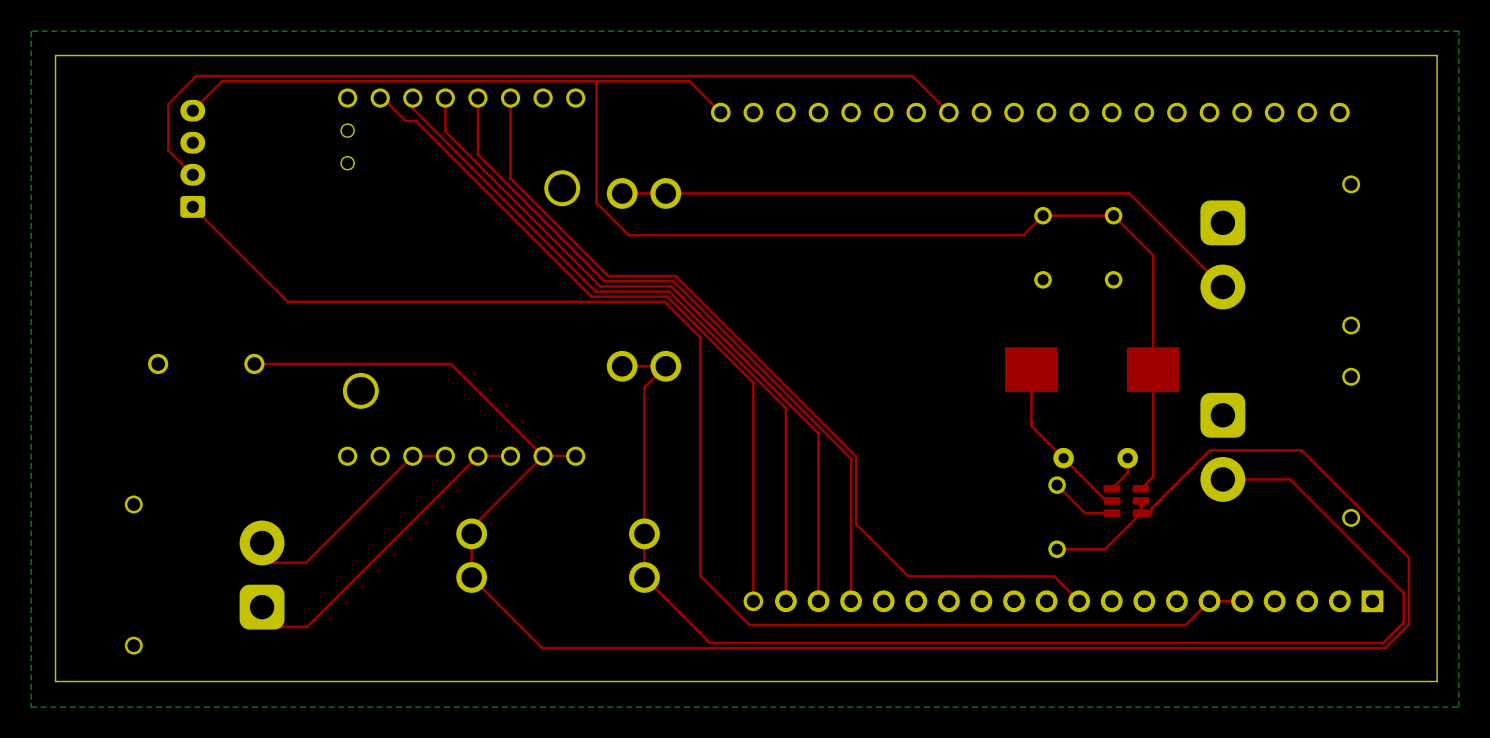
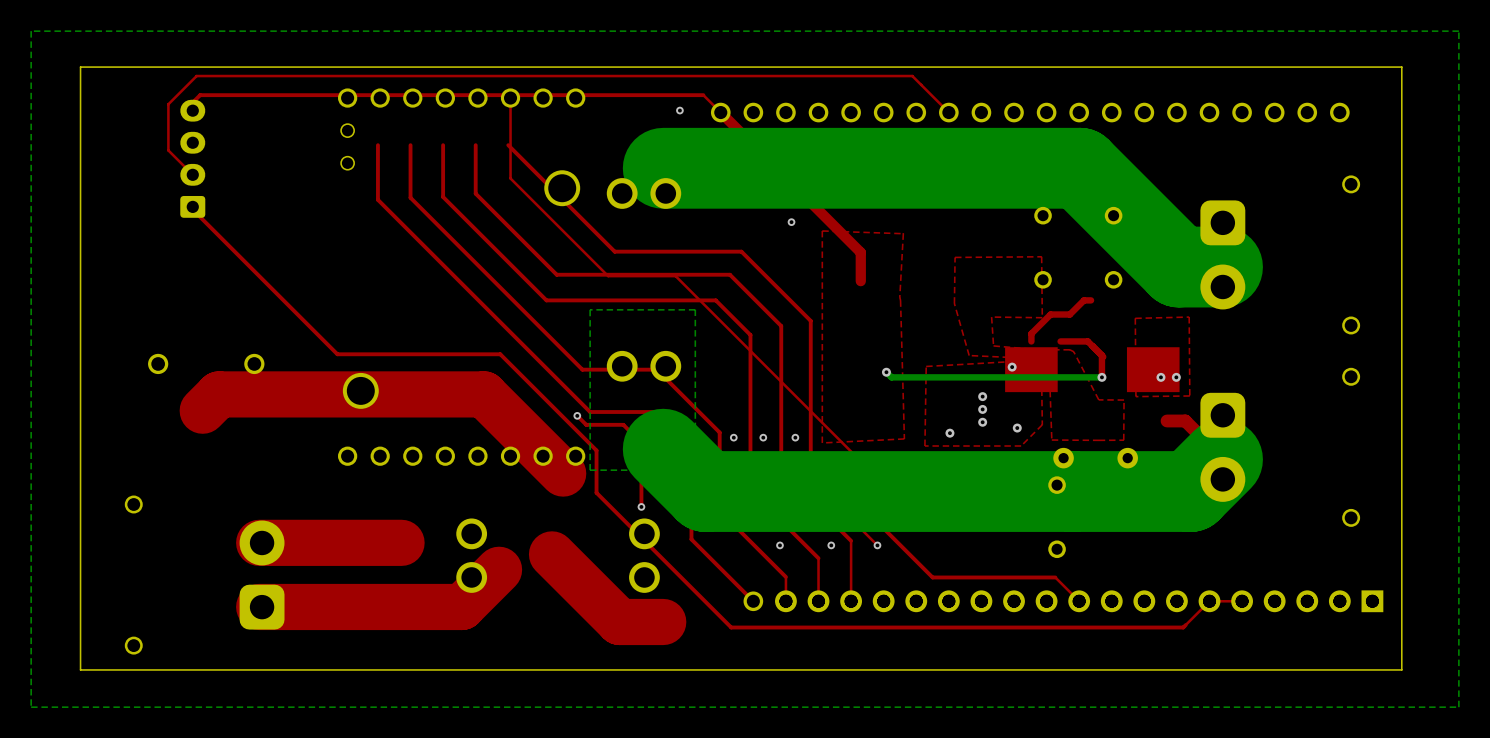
board edge: (1437, 55) (55, 55) (55, 681) (1437, 681) (1437, 55) -> (1401, 67) (1401, 669) (80, 669) (80, 67) (1401, 67)
top track: (596, 81) (596, 202) (628, 235) (1023, 235) (1043, 215) (1113, 215) (1153, 255) (1153, 476) (1141, 488) -> none
top track: (703, 95) (689, 81) (222, 81) (192, 110) -> (703, 95) (200, 95) (187, 107)
top track: (380, 98) (382, 98) (405, 120) (415, 120) (591, 296) (667, 296) (753, 382) (753, 601) -> (377, 145) (377, 199) (590, 412) (660, 412) (691, 442) (691, 539) (753, 601)
top track: (412, 98) (412, 108) (595, 291) (669, 291) (785, 408) (785, 577) -> (410, 145) (410, 197) (582, 369) (656, 369) (719, 432) (719, 510) (785, 577)
top track: (445, 98) (445, 131) (600, 286) (671, 286) (818, 433) (818, 558) -> (443, 145) (443, 197) (546, 300) (715, 300) (750, 335) (750, 490) (818, 558)
top track: (477, 98) (477, 154) (604, 281) (673, 281) (851, 458) (851, 540) -> (475, 145) (475, 193) (556, 274) (729, 274) (781, 326) (781, 471) (851, 540)
via: none -> (679, 110)
top track: none -> (720, 112) (860, 252) (860, 281)
bottom track: none -> (663, 168) (1080, 168) (1178, 267) (1222, 267)
top track: (622, 193) (1129, 193) (1222, 286) -> none
top track: (192, 206) (287, 301) (664, 301) (700, 337) (700, 576) (749, 625) (1185, 625) -> (187, 204) (337, 354) (500, 354) (596, 450) (596, 492) (731, 627) (1183, 627) (1185, 625)
via: none -> (791, 222)
top zone outline: none -> (822, 230) (822, 442) (904, 438) (899, 297) (903, 233) (822, 230)
top zone outline: none -> (1041, 256) (955, 257) (954, 303) (969, 355) (1039, 358) (1039, 349) (993, 345) (991, 317) (1042, 317) (1041, 256)
top track: none -> (1091, 300) (1083, 300) (1069, 314) (1050, 314) (1031, 333) (1031, 341)
bottom zone outline: none -> (695, 309) (590, 309) (590, 470) (695, 470) (695, 309)
top zone outline: none -> (1189, 317) (1189, 395) (1135, 396) (1135, 318) (1189, 317)
top track: none -> (1060, 341) (1087, 341) (1103, 356)
top zone outline: none -> (1069, 349) (1048, 349) (1051, 440) (1123, 440) (1124, 400) (1098, 399) (1073, 351) (1069, 349)
top track: none -> (1101, 355) (1101, 377)
top zone outline: none -> (1041, 361) (926, 366) (924, 445) (1021, 445) (1042, 424) (1041, 361)
top track: (254, 363) (450, 363) (543, 456) -> none
top track: (622, 366) (665, 366) (644, 387) (644, 577) (710, 643) (1383, 643) (1403, 622) (1403, 593) (1290, 479) (1222, 479) -> none
via: none -> (1012, 367)
top track: (1031, 369) (1031, 425) (1106, 500) (1111, 500) -> none
bottom track: none -> (886, 372) (891, 377) (1101, 377)
via: none -> (886, 372)
via: none -> (1101, 377)
via: none -> (1160, 377)
via: none -> (1176, 377)
via: none -> (982, 396)
via: none -> (982, 409)
top track: none -> (202, 410) (219, 394) (484, 394) (563, 473)
top track: none -> (577, 415) (586, 424) (623, 424) (641, 442) (641, 506)
via: none -> (577, 415)
top track: none -> (1167, 420) (1185, 420) (1222, 458)
via: none -> (982, 422)
via: none -> (1017, 428)
via: none -> (949, 433)
via: none -> (733, 437)
via: none -> (763, 437)
via: none -> (795, 437)
bottom track: none -> (663, 449) (705, 491) (1190, 491) (1222, 459)
top track: (445, 456) (412, 456) (306, 562) (262, 562) (262, 542) -> none
top track: (510, 456) (477, 456) (307, 626) (262, 626) (262, 607) -> none
top track: (543, 456) (471, 527) (471, 577) (542, 648) (1385, 648) (1408, 624) (1408, 557) (1301, 450) (1209, 450) (1151, 509) (1151, 512) (1147, 515) (1144, 515) (1141, 512) -> none
top track: (575, 456) (543, 456) -> none
top track: (1127, 458) (1127, 473) (1111, 488) -> none
top track: (1057, 485) (1085, 513) (1111, 513) -> none
top track: (1141, 500) (1141, 513) (1105, 549) (1057, 549) -> none
via: none -> (641, 506)
top track: none -> (401, 542) (259, 542)
via: none -> (779, 545)
via: none -> (831, 545)
top track: (877, 545) (908, 576) (1055, 577) -> (508, 145) (614, 251) (741, 251) (810, 320) (810, 455) (932, 577) (1055, 577)
via: none -> (877, 545)
top track: none -> (552, 554) (619, 621) (663, 621)
top track: none -> (499, 569) (461, 606) (259, 606)

